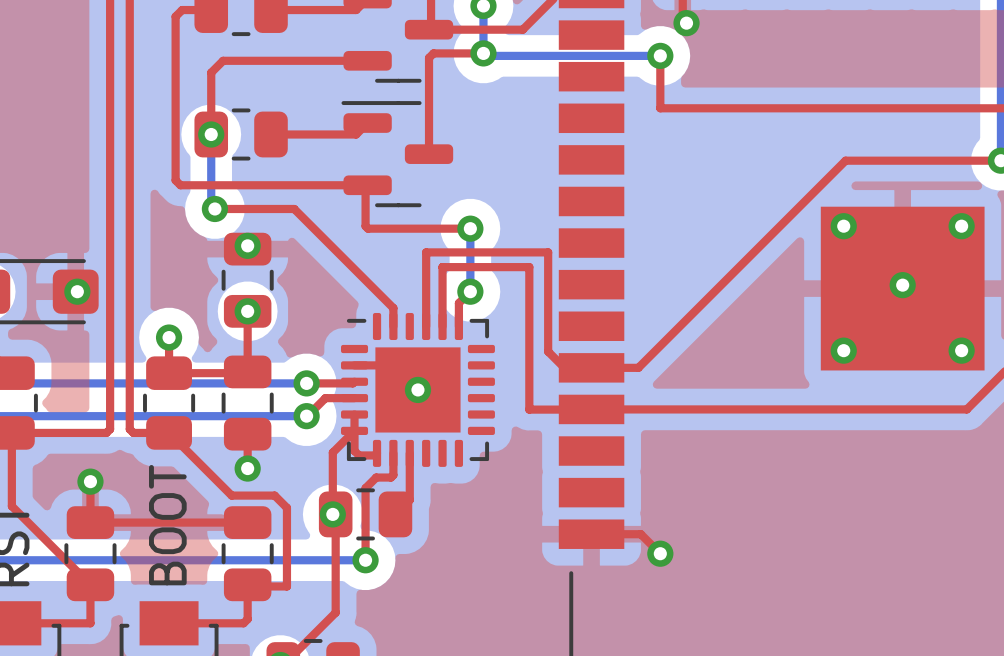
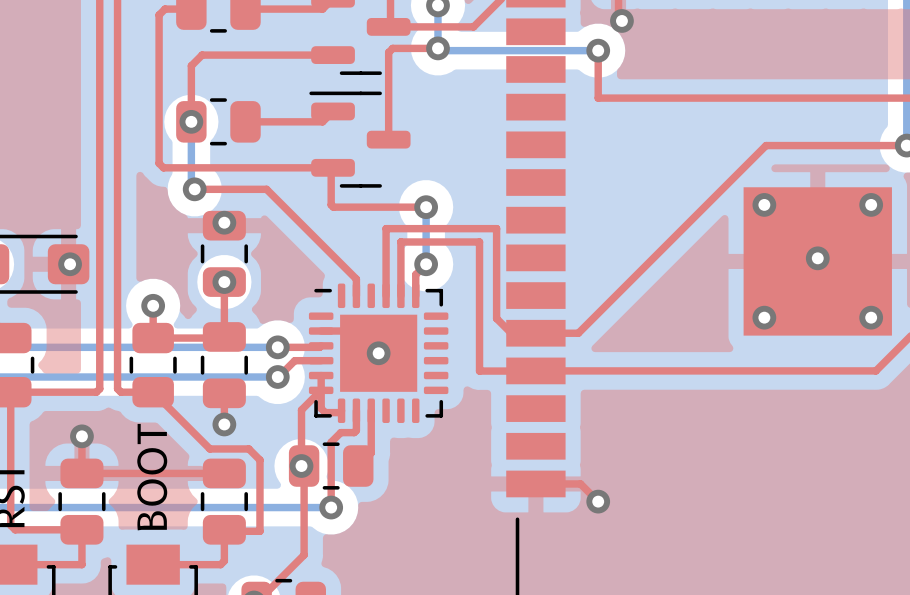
top track: (11, 506) (90, 584) -> (10, 458) (10, 525) (15, 529) (81, 529)

